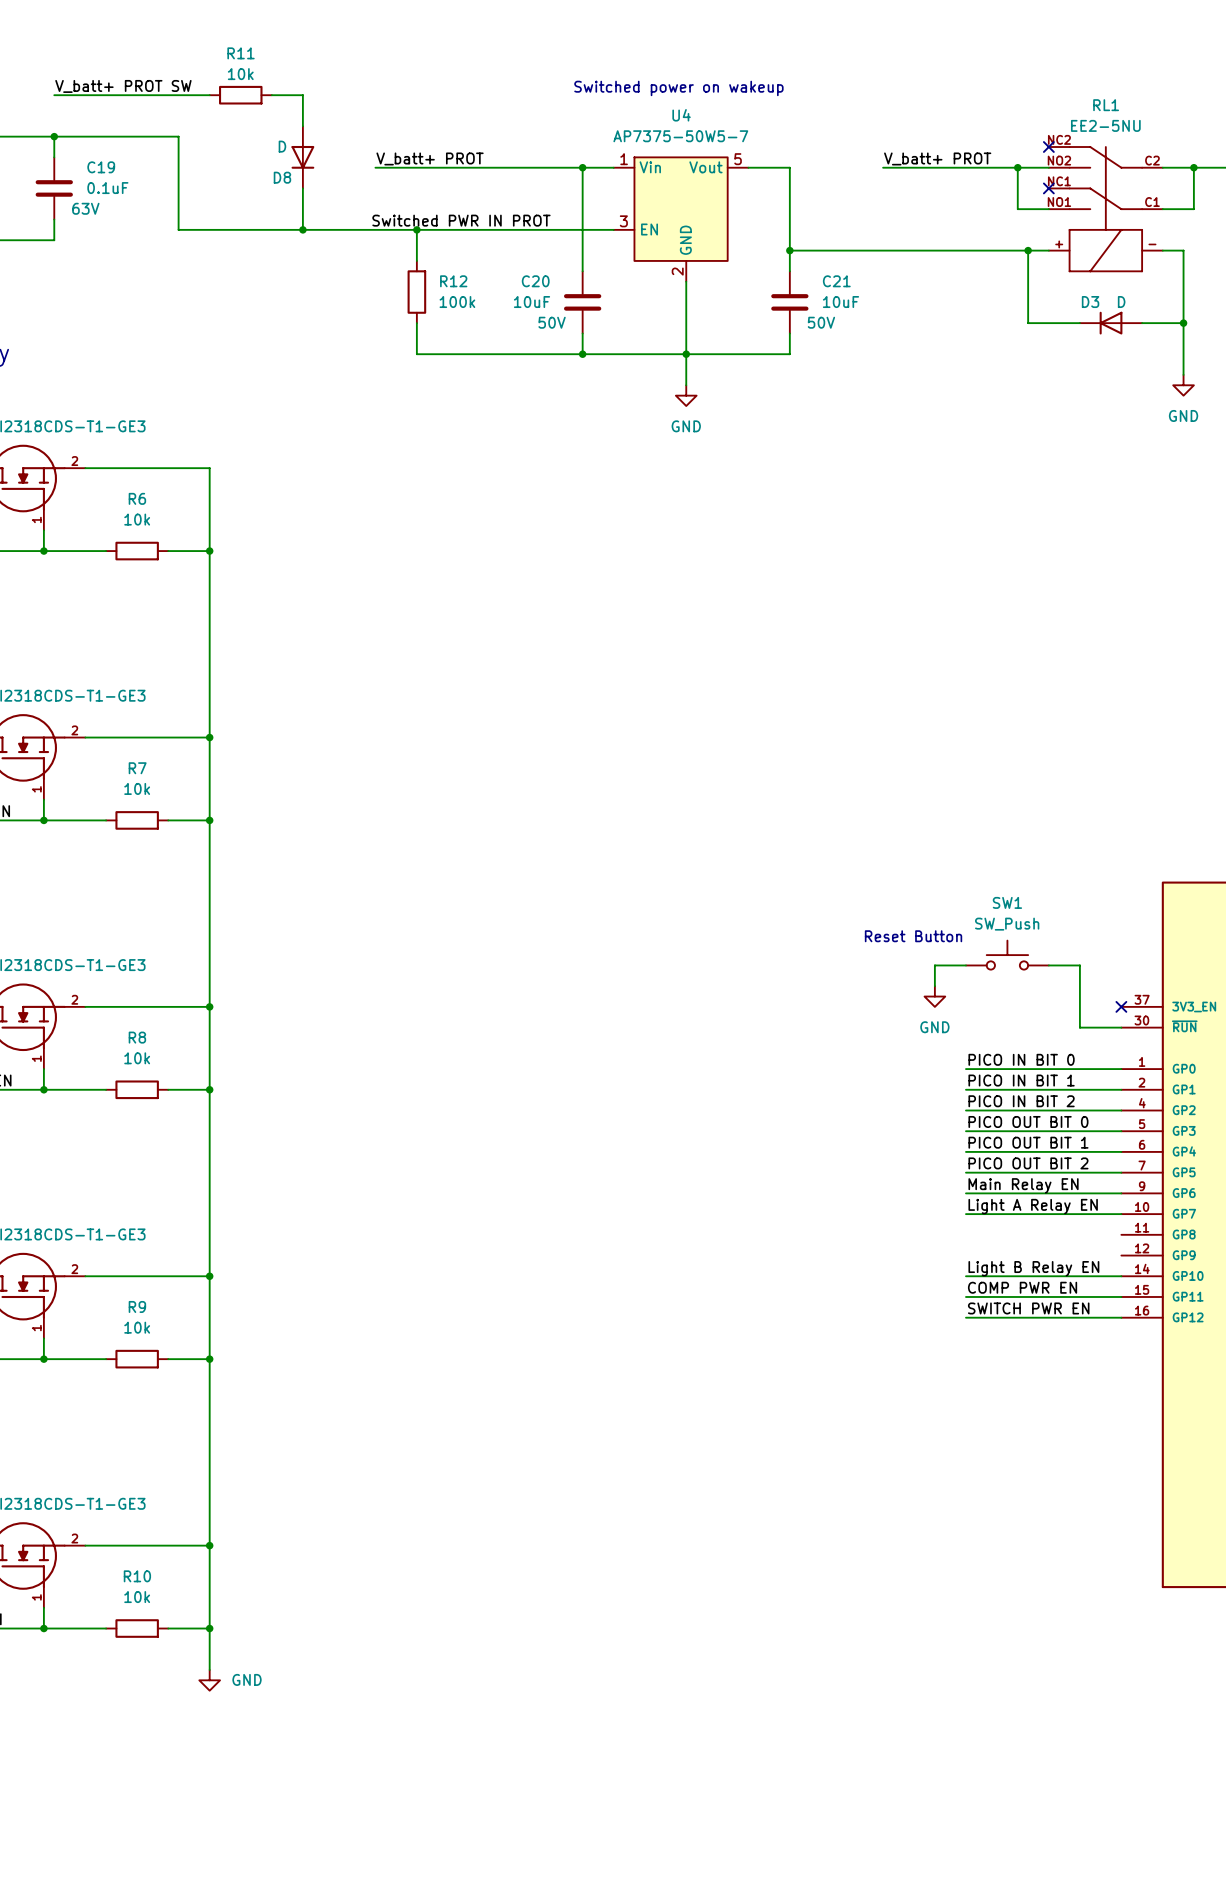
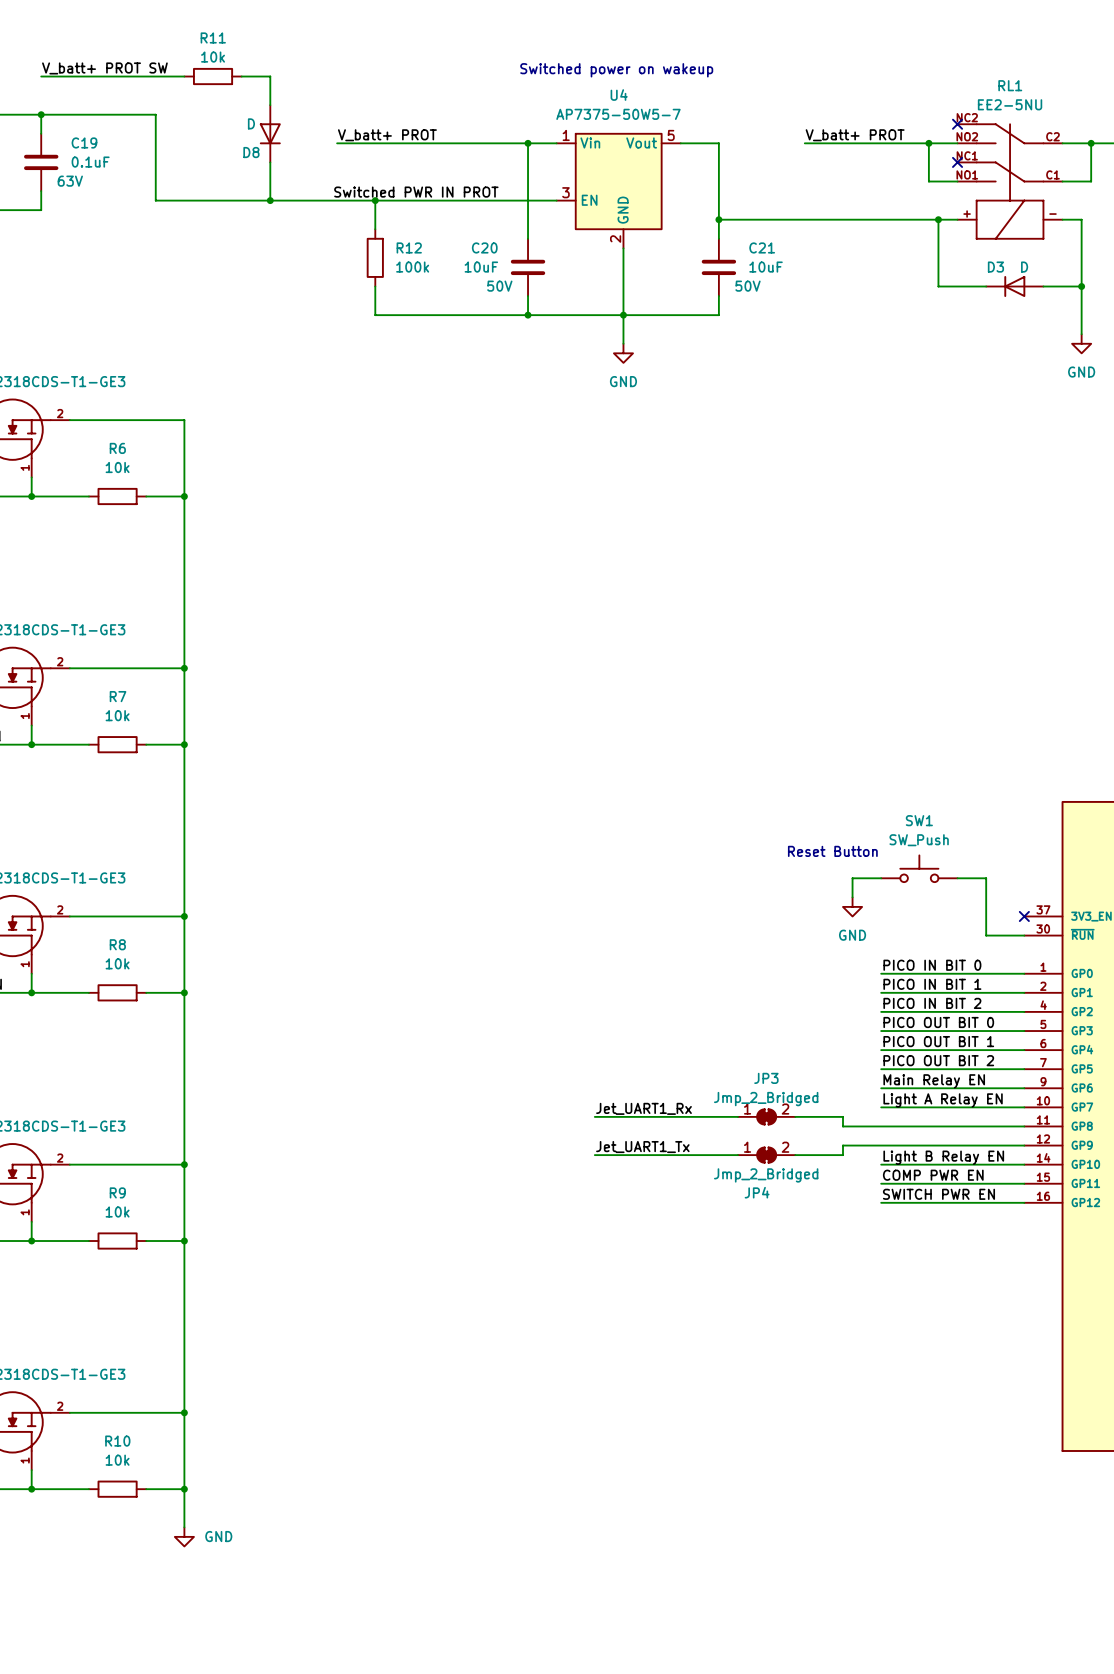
label: none -> Jet_UART1_Rx (643, 1108)
wire: none -> (594, 1116) (738, 1116)
JP3: none -> Jmp_2_Bridged (766, 1116)
wire: none -> (795, 1116) (843, 1116) (843, 1126) (1024, 1126)
wire: none -> (1024, 1145) (843, 1145) (843, 1155) (795, 1155)
label: none -> Jet_UART1_Tx (642, 1147)
wire: none -> (594, 1155) (738, 1155)
JP4: none -> Jmp_2_Bridged (766, 1155)

